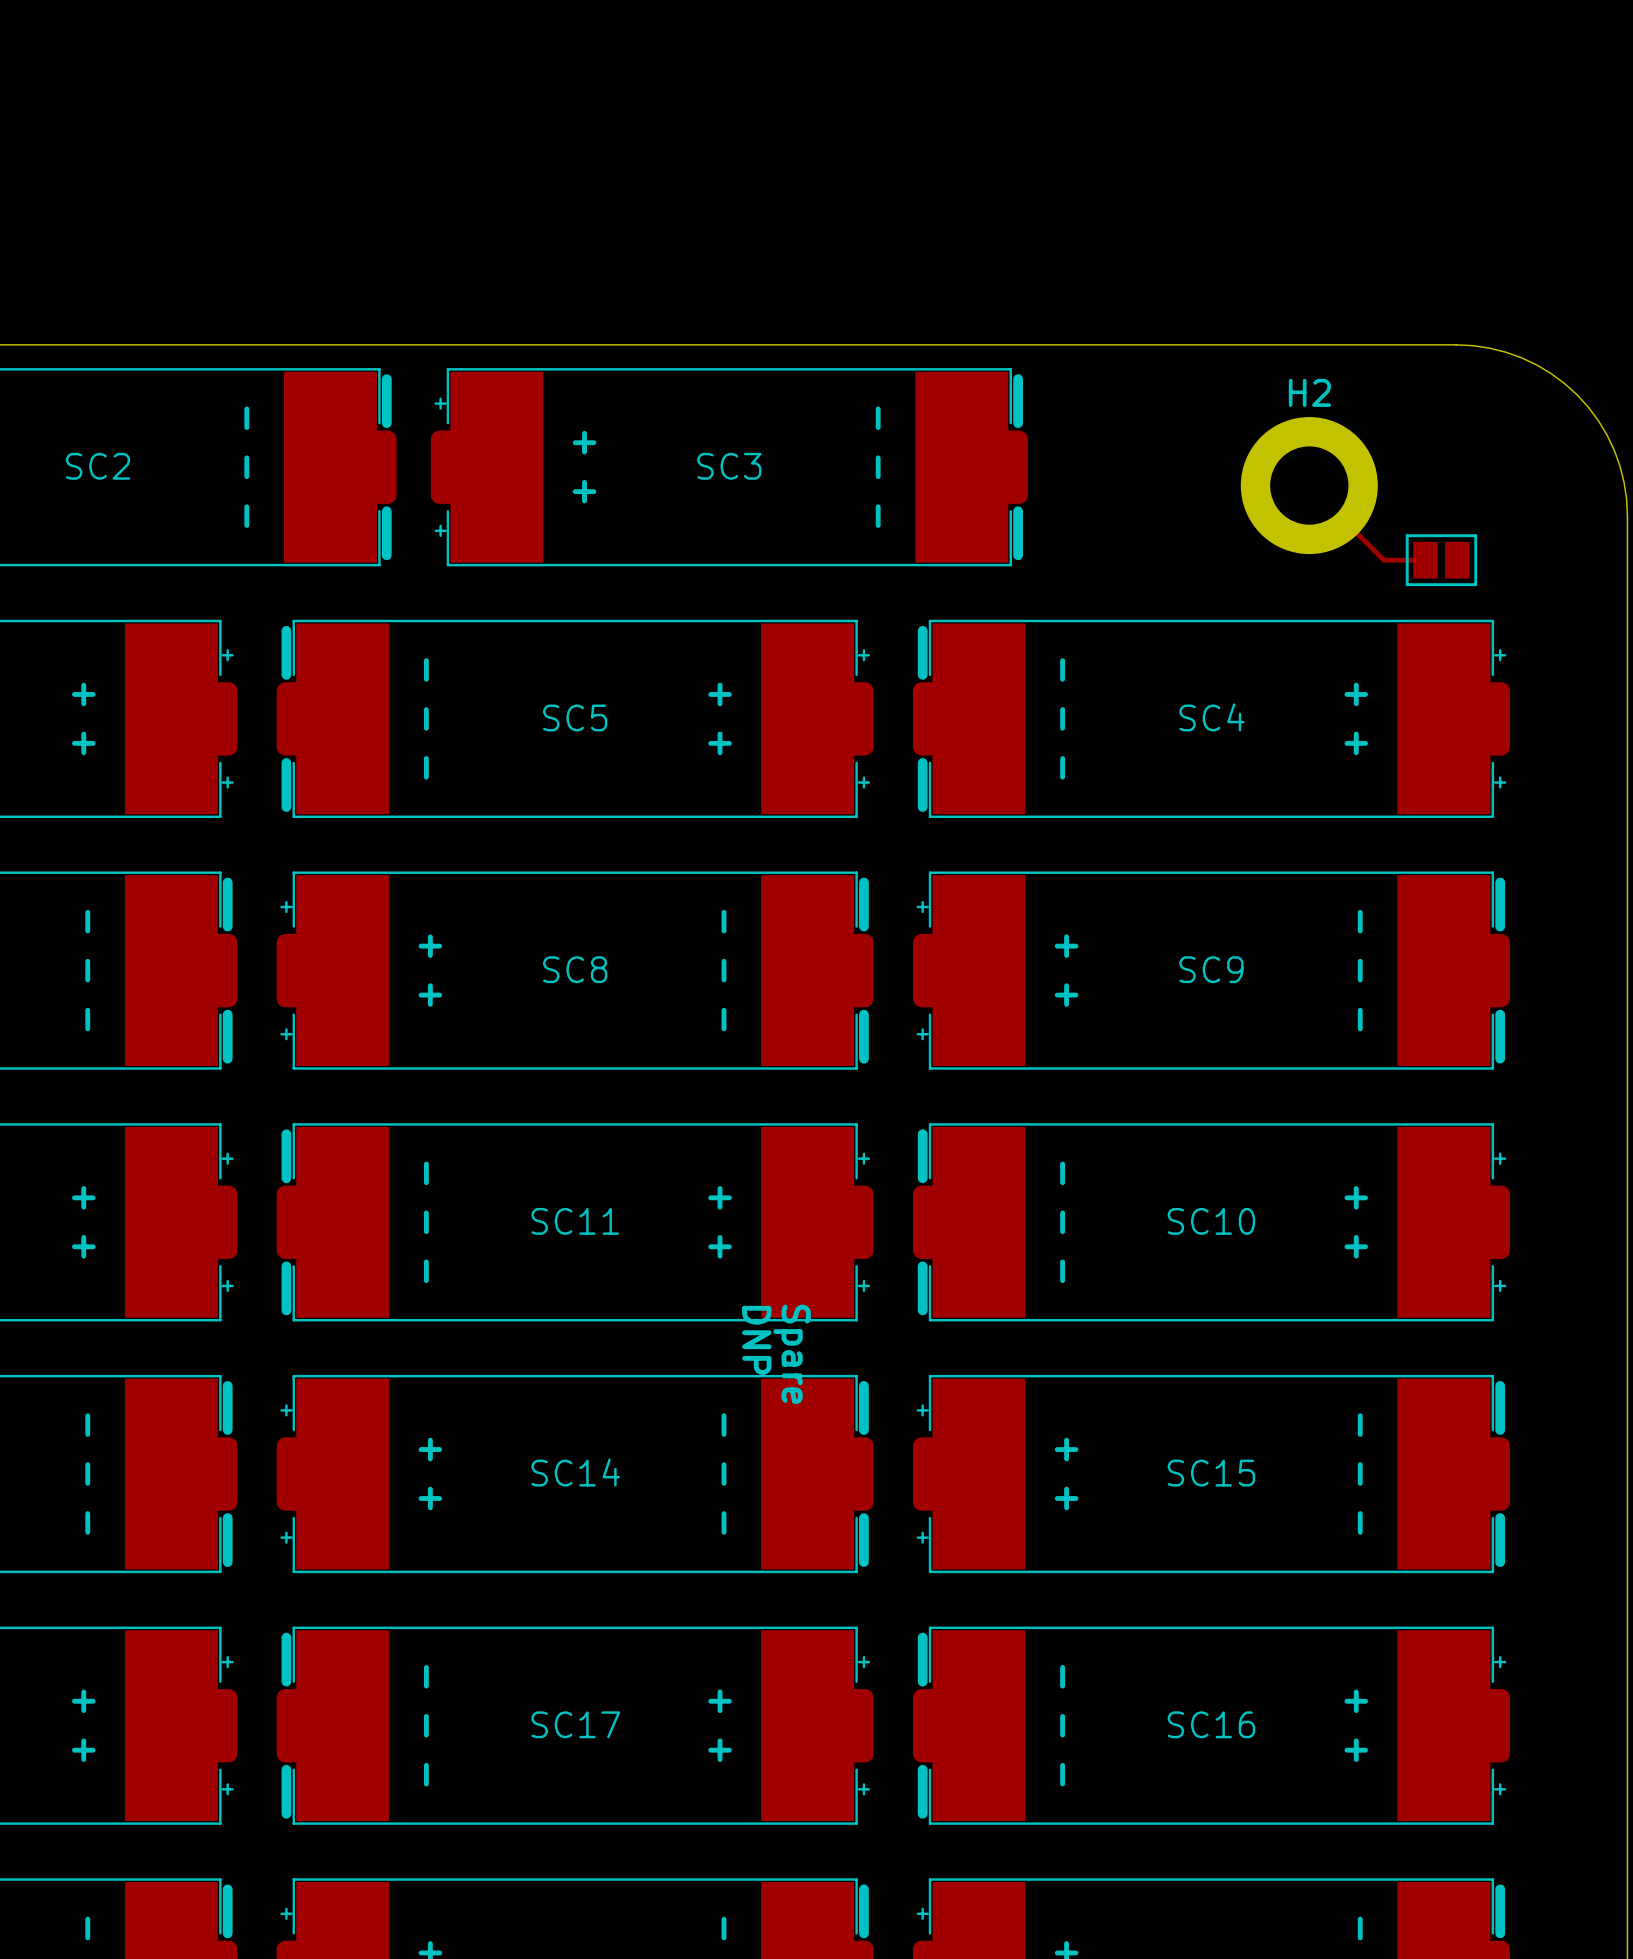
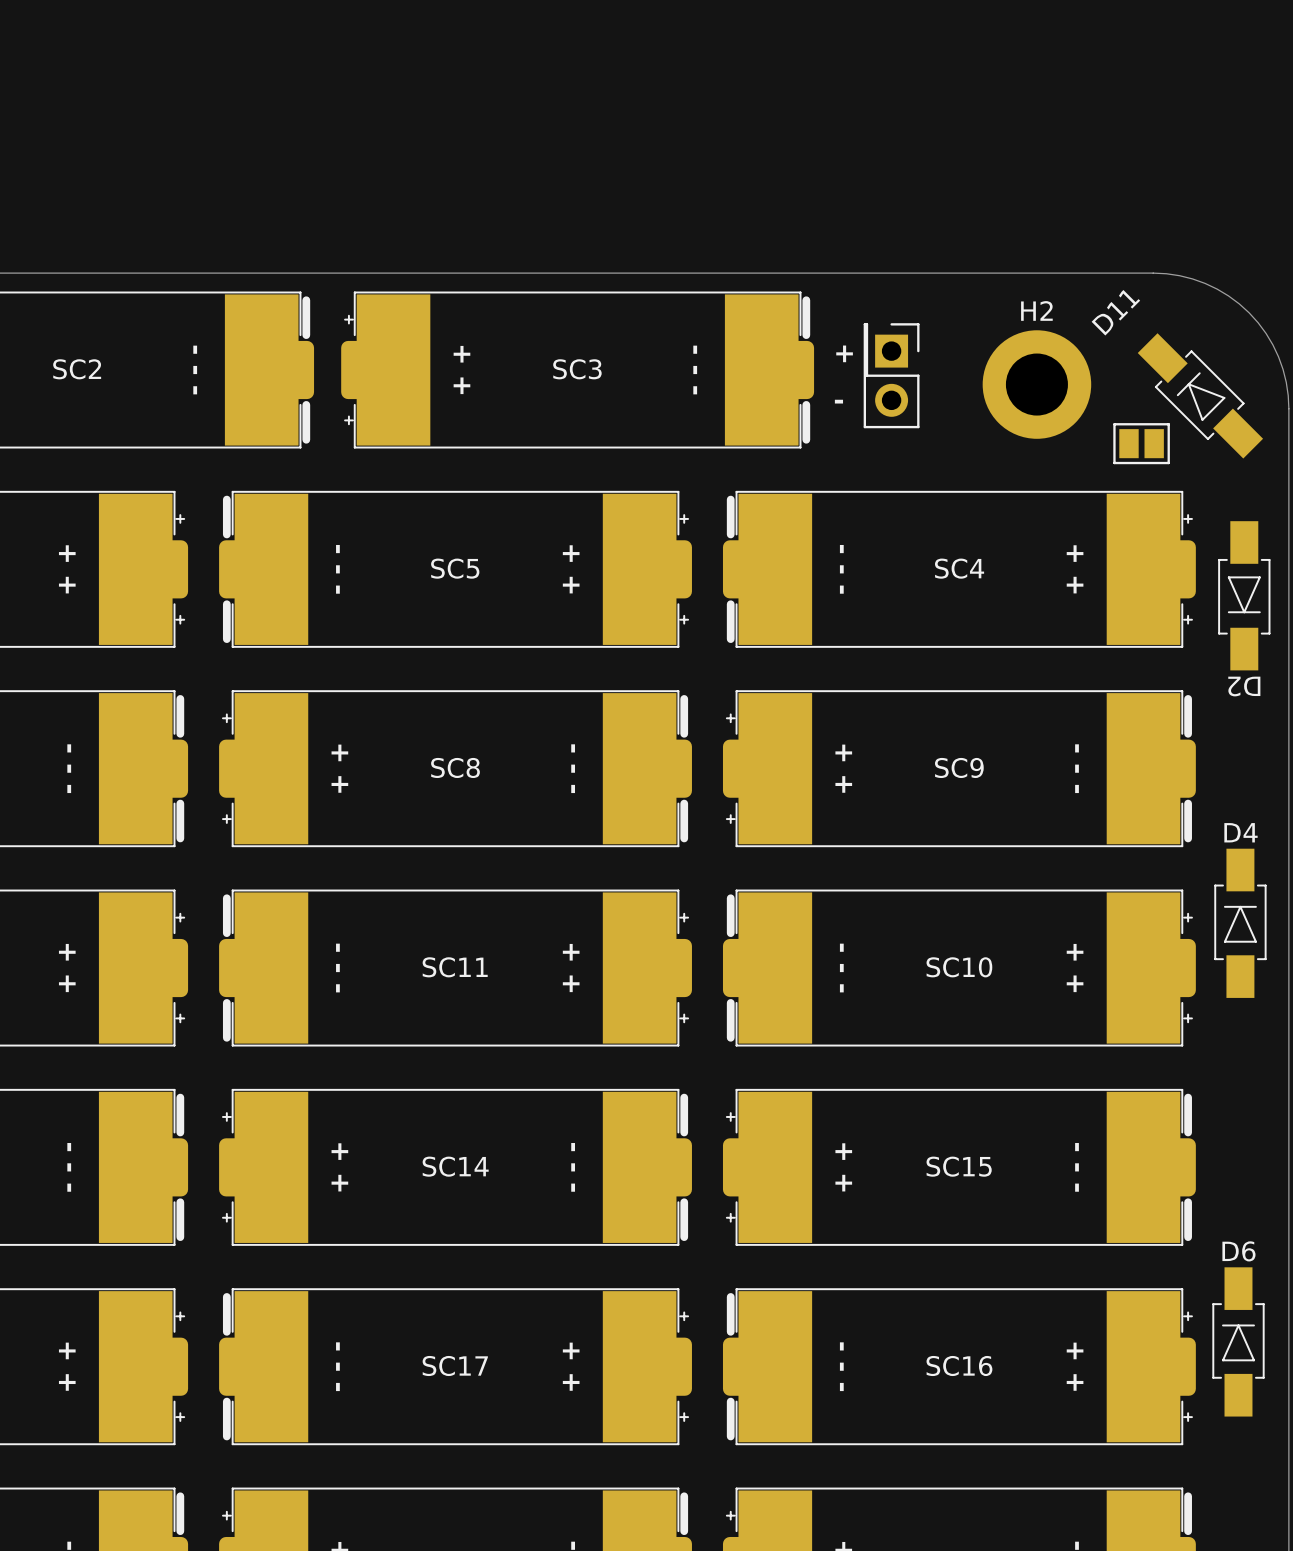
text: none -> + (844, 353)
part: none -> (891, 375)
track: (1309, 485) (1383, 560) (1425, 560) -> none
D11: none -> (1200, 395)
text: none -> - (838, 401)
D2: none -> (1244, 595)
D4: none -> (1240, 923)
text: DNP (756, 1340) -> none
text: Spare (792, 1354) -> none
D6: none -> (1238, 1341)

